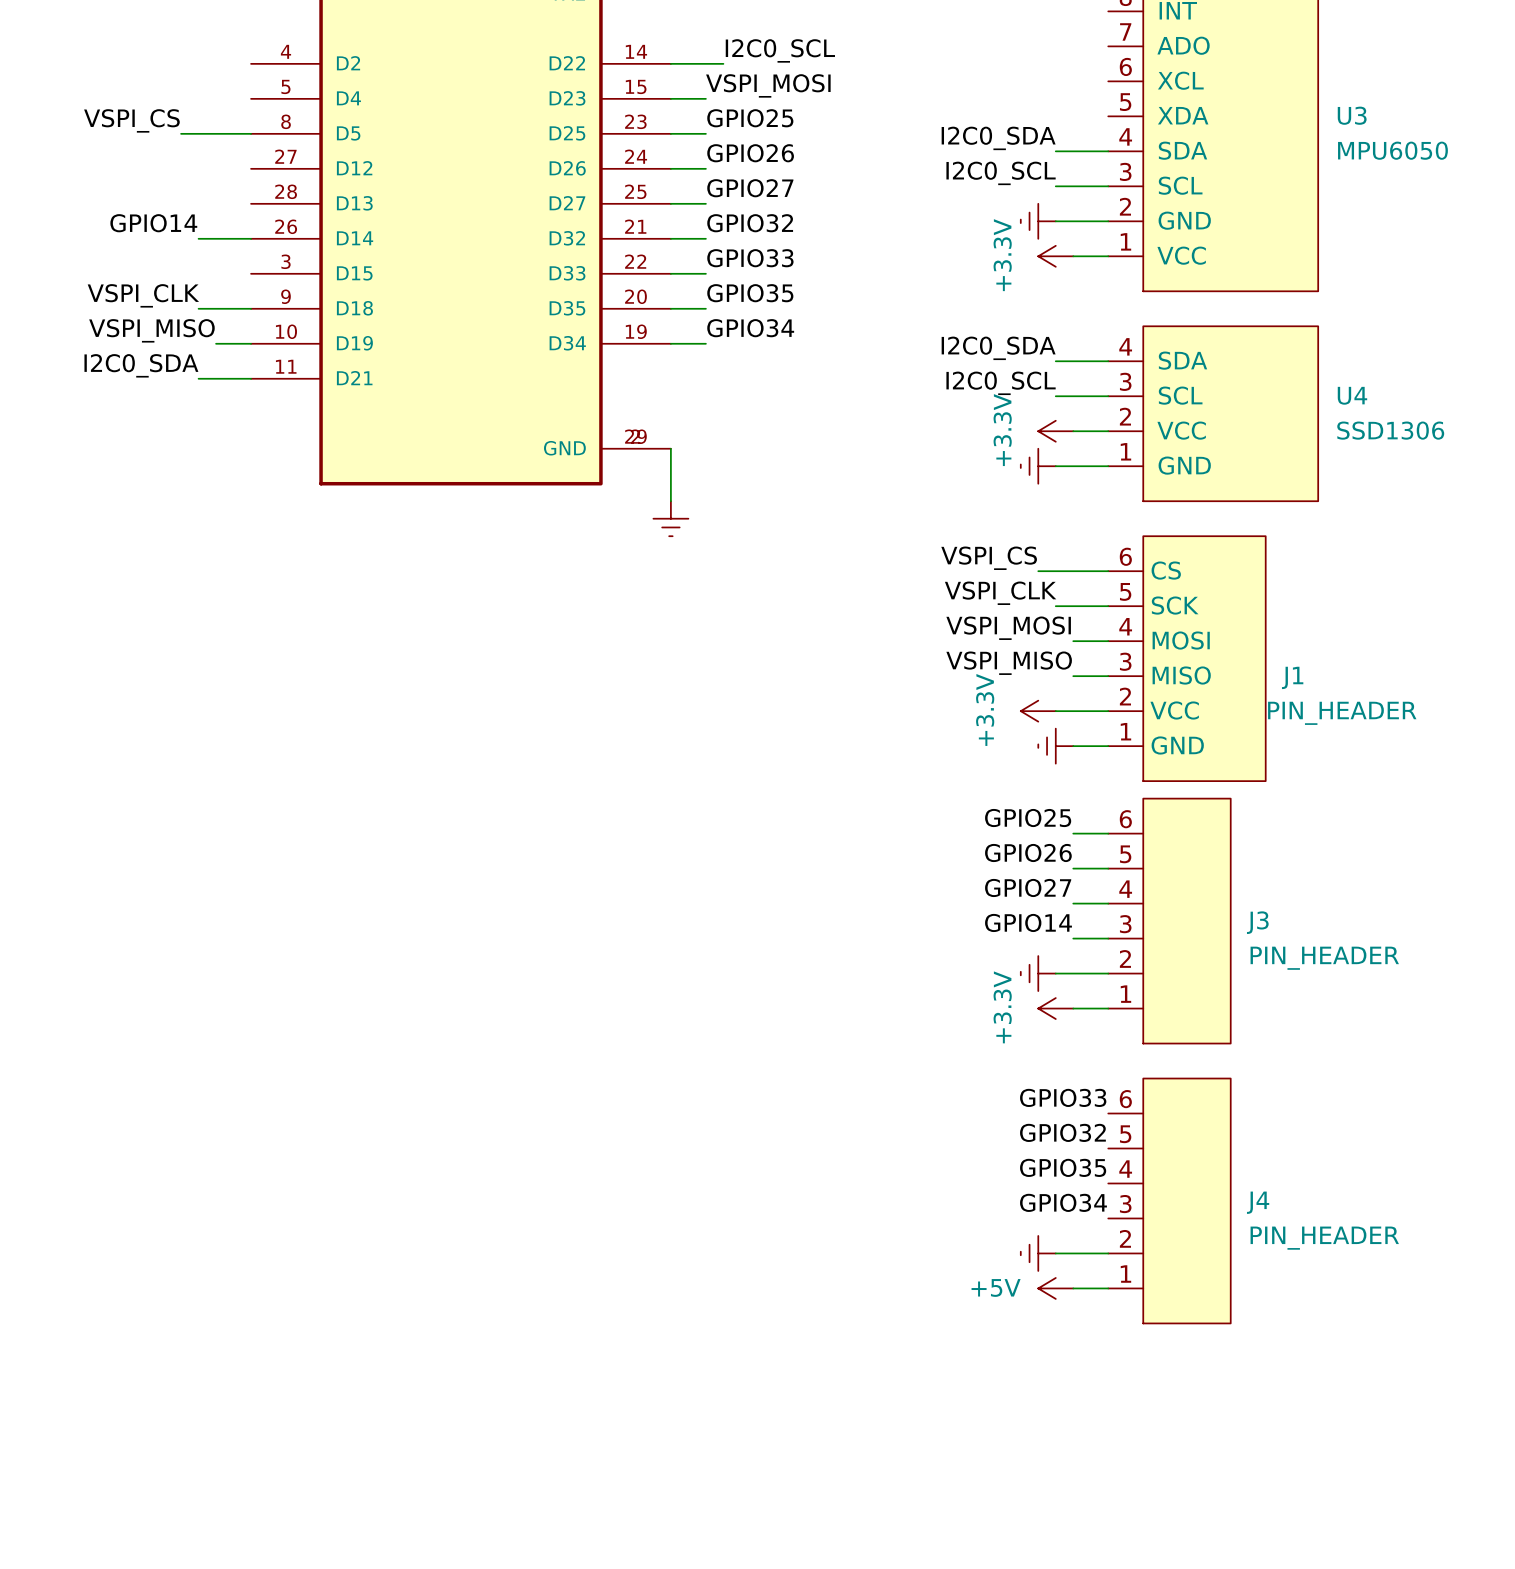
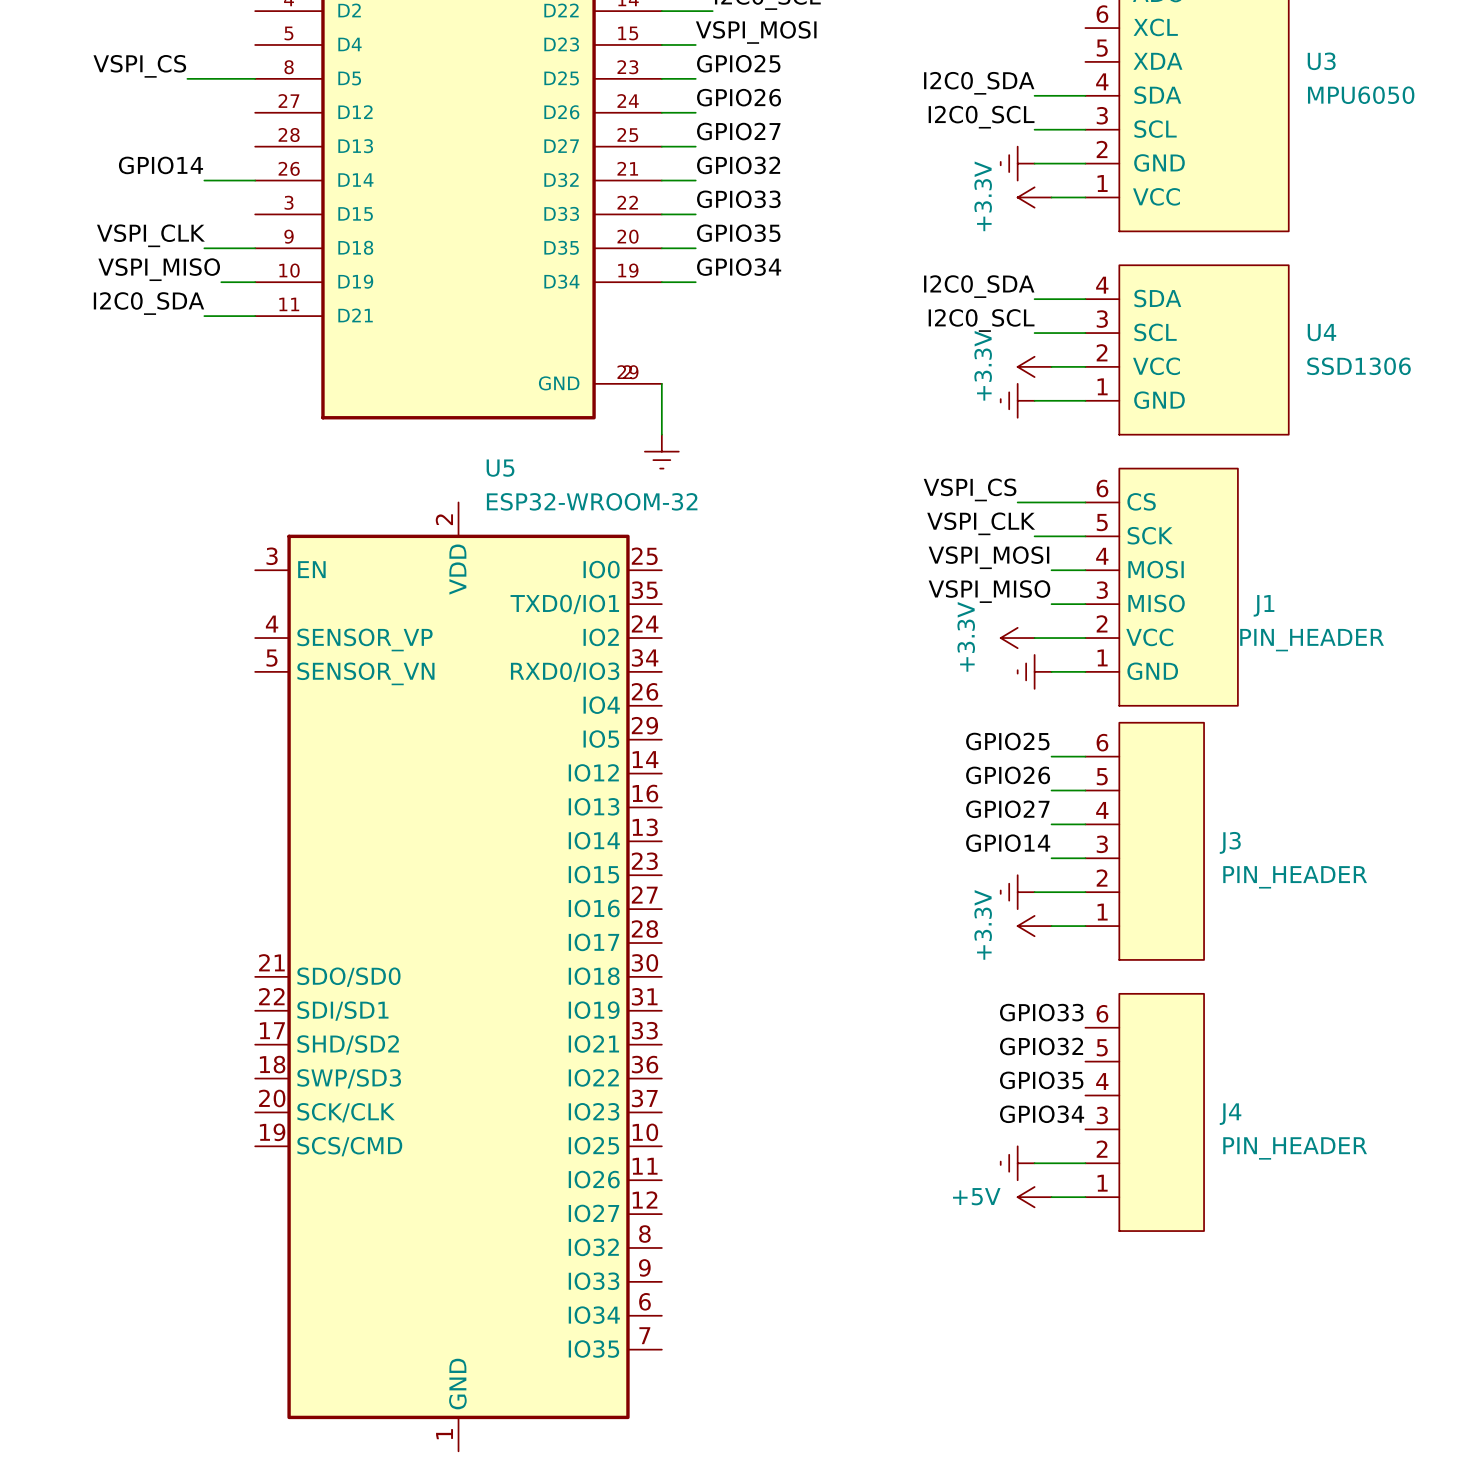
U5: none -> ESP32-WROOM-32 (458, 976)

